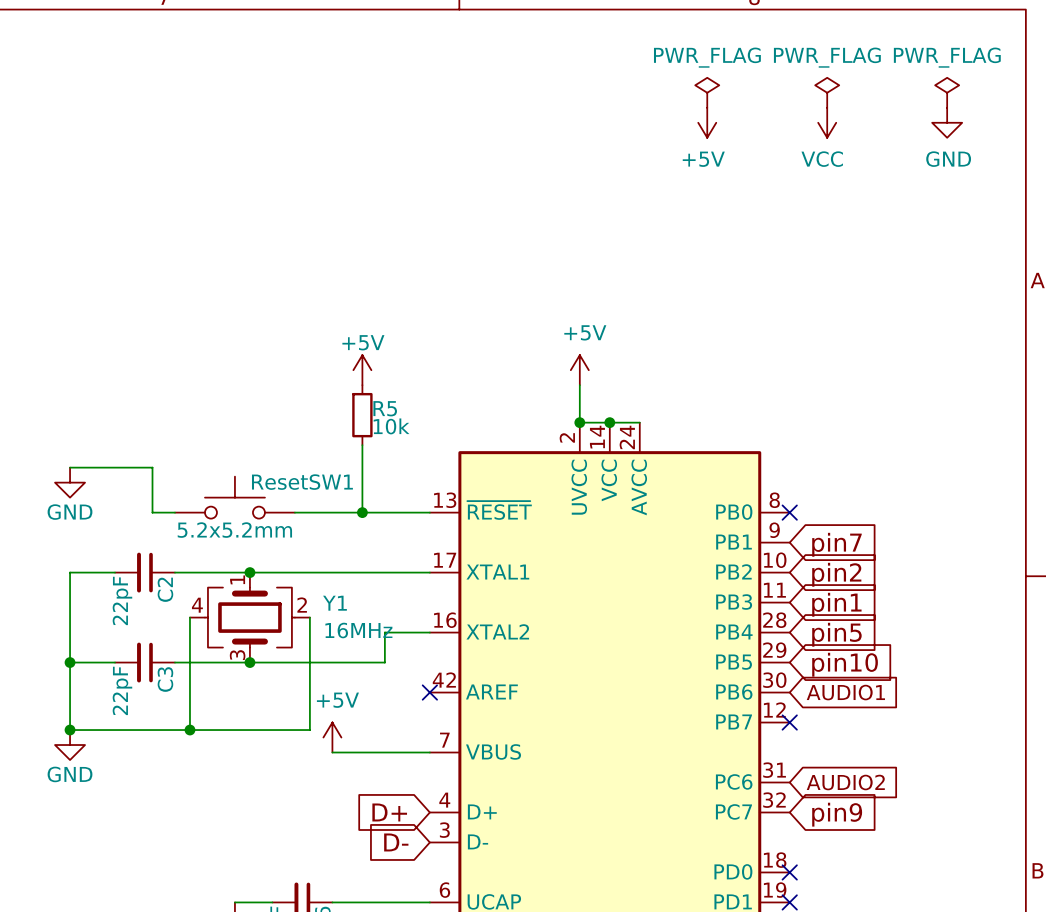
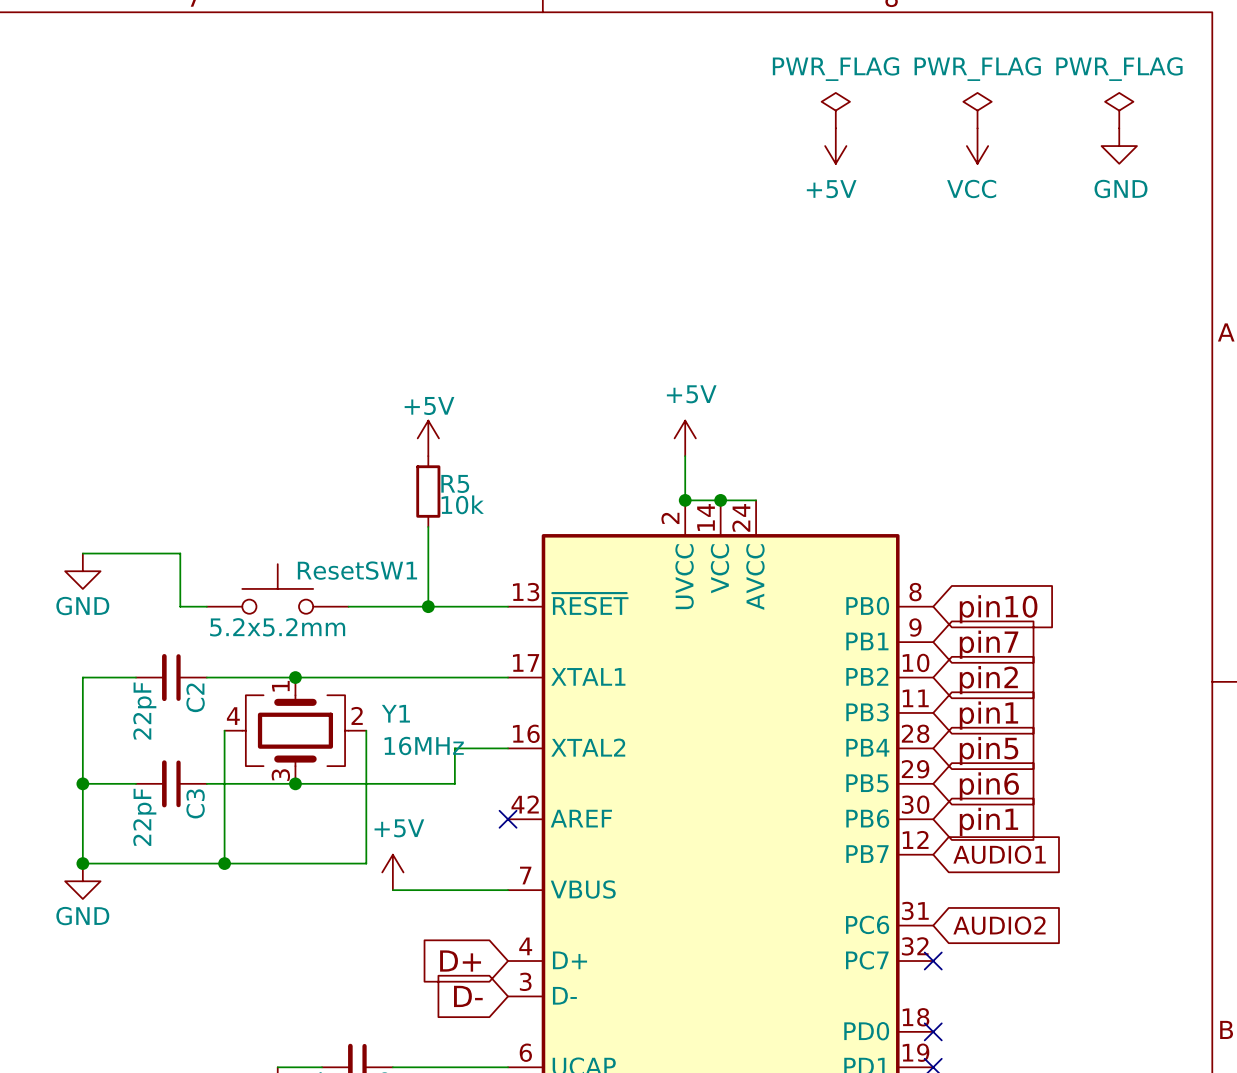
no-connect mark: (789, 512) -> none
global label: none -> pin10 (998, 609)
global label: pin10 (845, 664) -> pin6 (989, 786)
global label: AUDIO1 (845, 692) -> pin1 (988, 821)
no-connect mark: (789, 722) -> none
global label: none -> AUDIO1 (999, 854)
no-connect mark: none -> (933, 961)
global label: pin9 (837, 814) -> none

